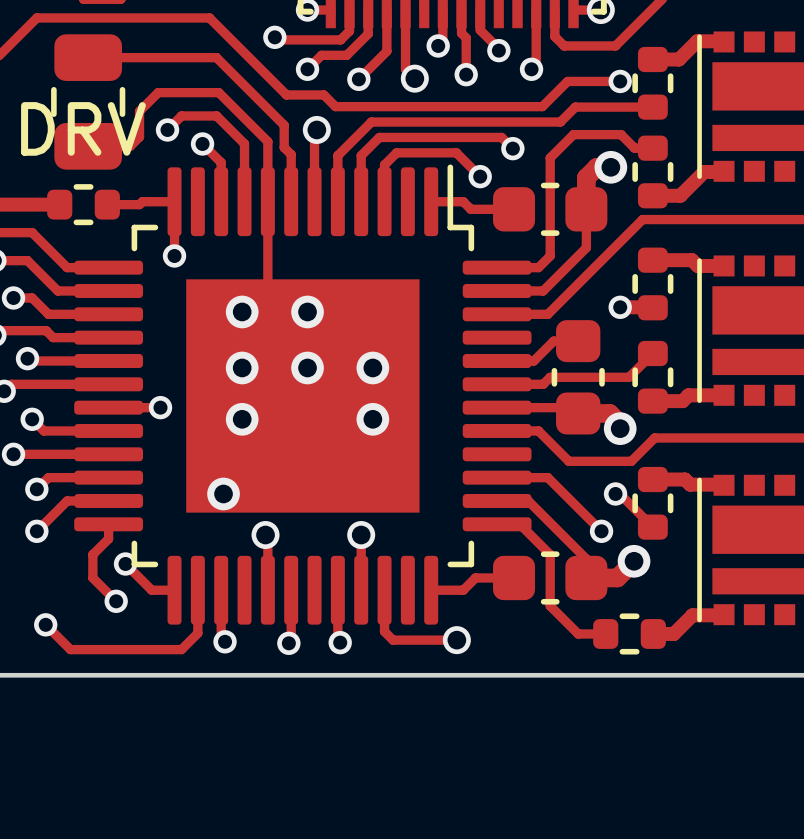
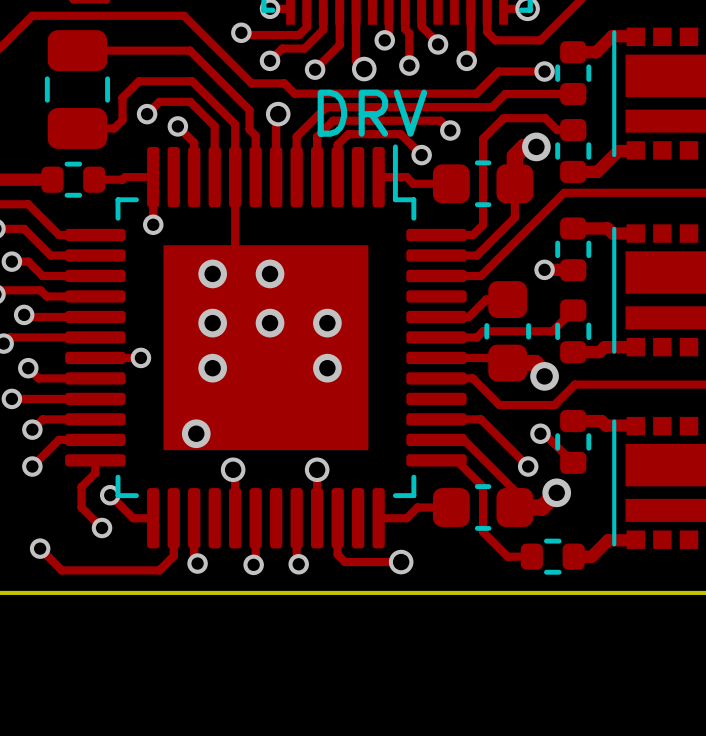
text position: DRV (83, 128) -> DRV (372, 113)

